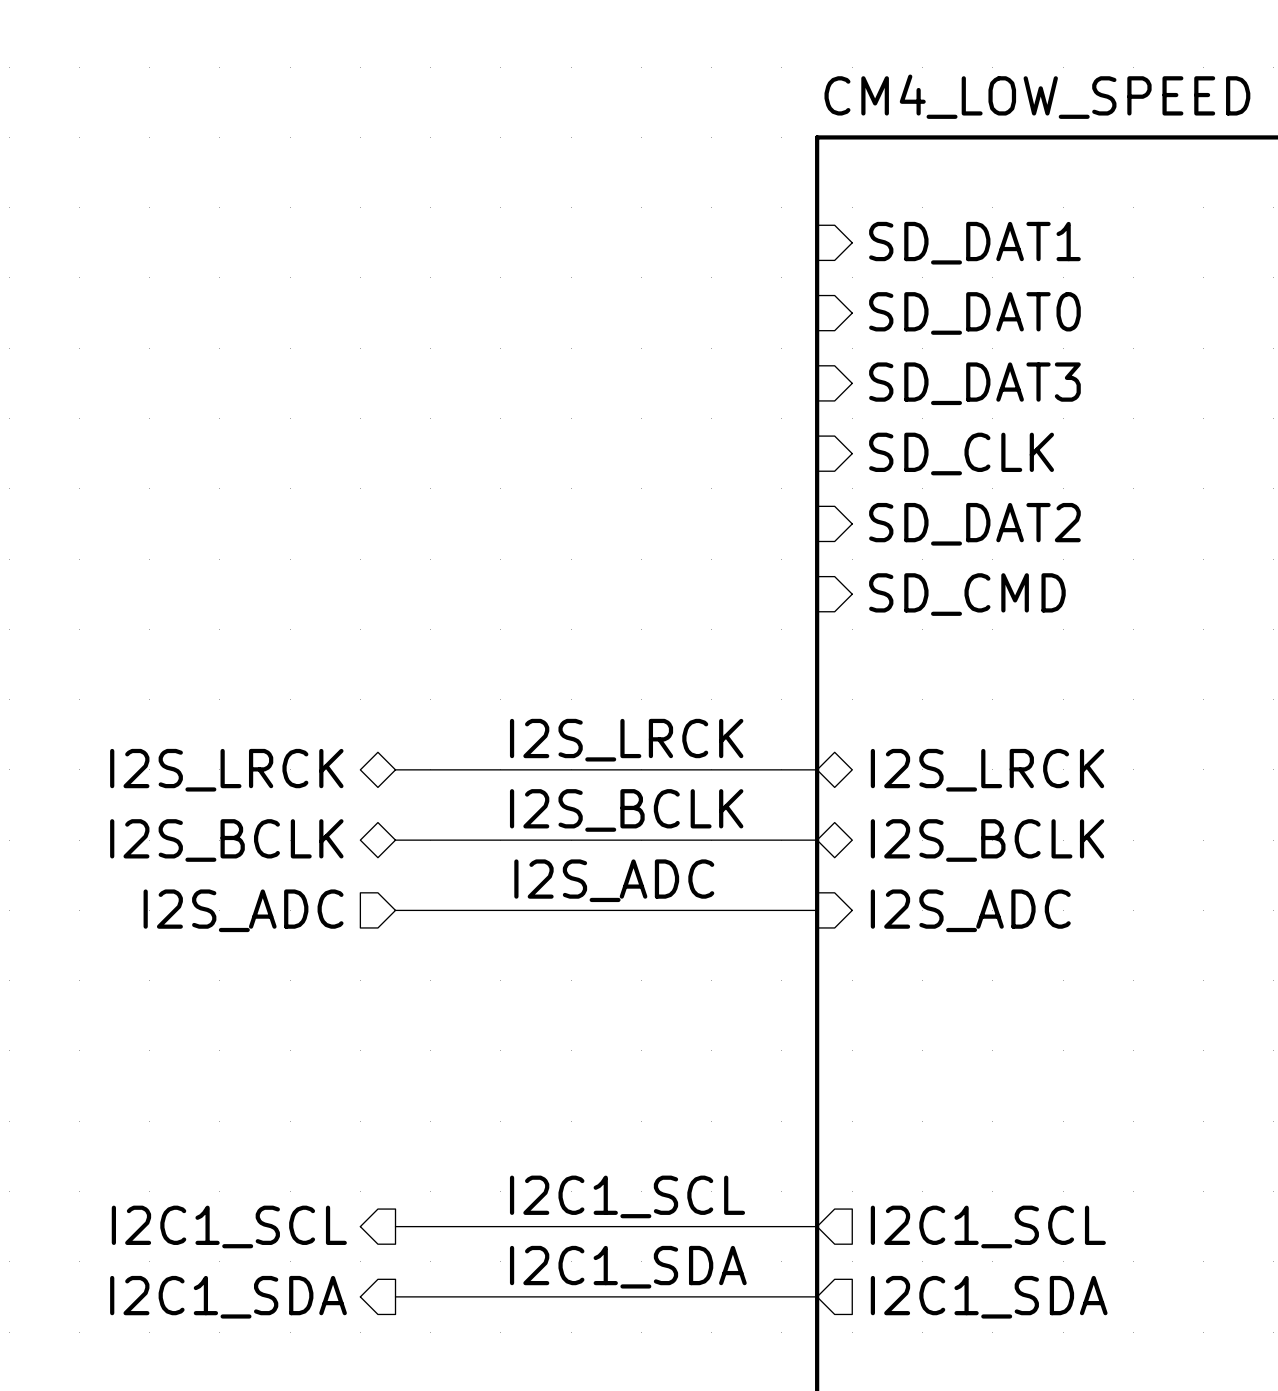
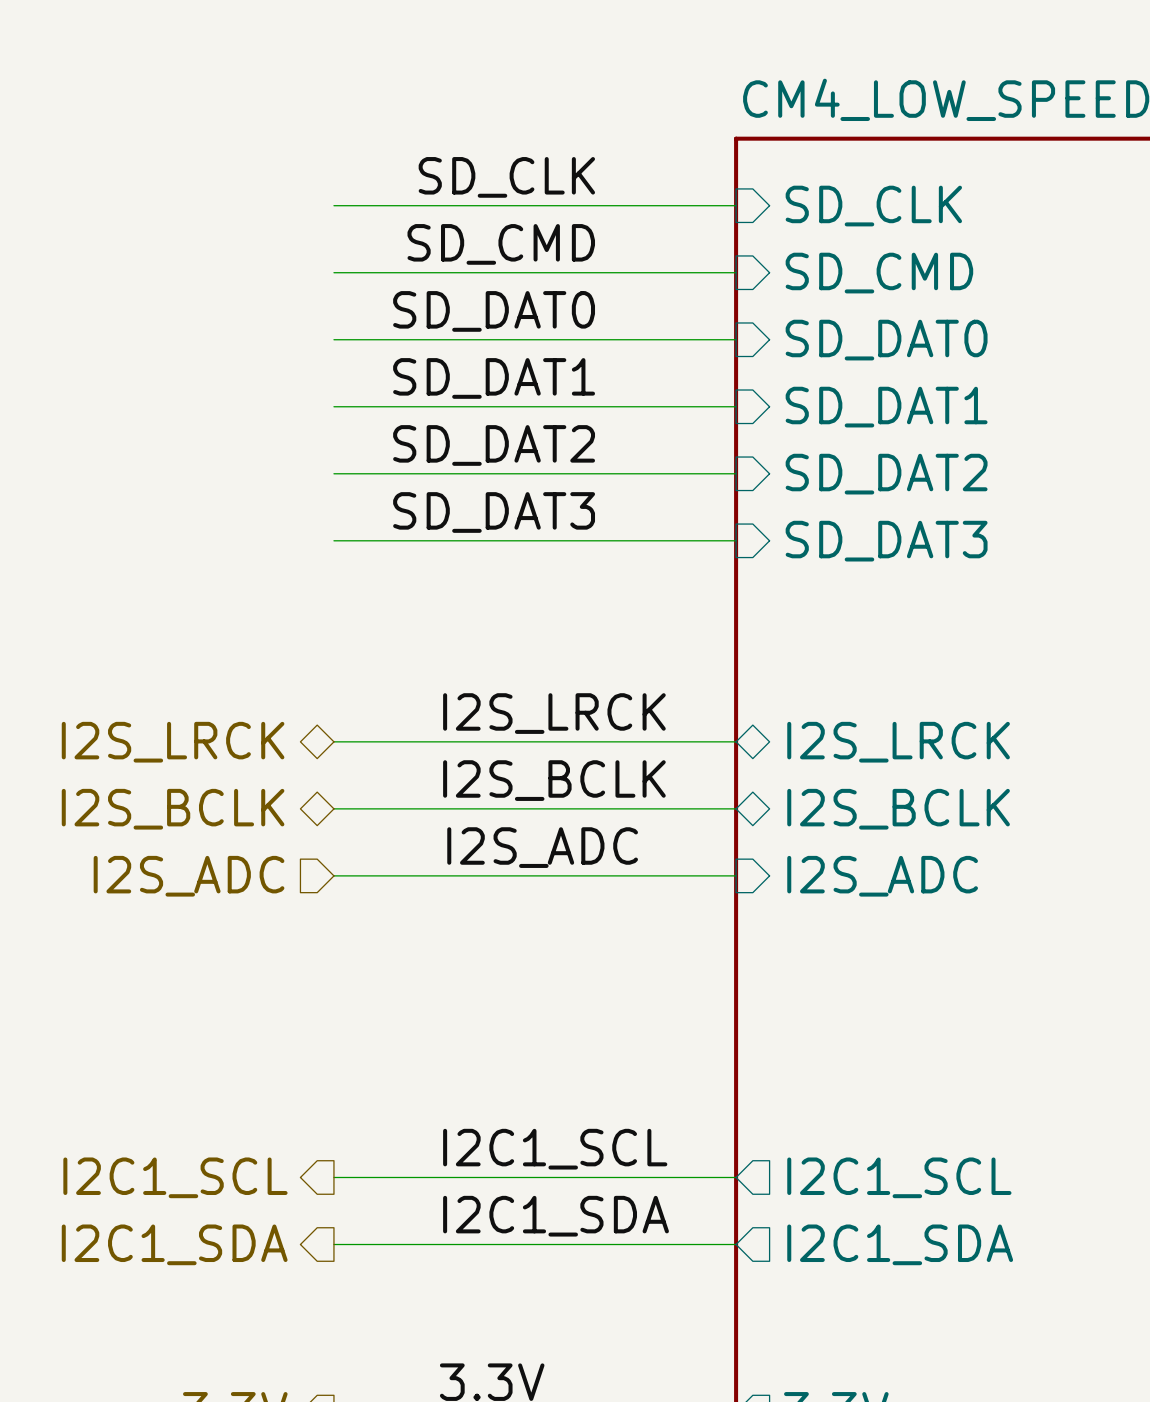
label: none -> SD_CLK (506, 177)
wire: none -> (333, 205) (736, 205)
sheet pin position: SD_DAT1 (974, 243) -> SD_DAT1 (886, 407)
label: none -> SD_CMD (501, 244)
wire: none -> (333, 272) (736, 272)
sheet pin position: SD_DAT0 (974, 313) -> SD_DAT0 (886, 340)
label: none -> SD_DAT0 (494, 311)
wire: none -> (333, 339) (736, 339)
sheet pin position: SD_DAT3 (974, 383) -> SD_DAT3 (886, 541)
label: none -> SD_DAT1 (494, 378)
wire: none -> (333, 406) (736, 406)
sheet pin position: SD_CLK (961, 454) -> SD_CLK (873, 206)
label: none -> SD_DAT2 (494, 445)
wire: none -> (333, 473) (736, 473)
sheet pin position: SD_DAT2 (974, 524) -> SD_DAT2 (886, 474)
label: none -> SD_DAT3 (494, 512)
wire: none -> (333, 540) (736, 540)
sheet pin position: SD_CMD (967, 594) -> SD_CMD (879, 273)

